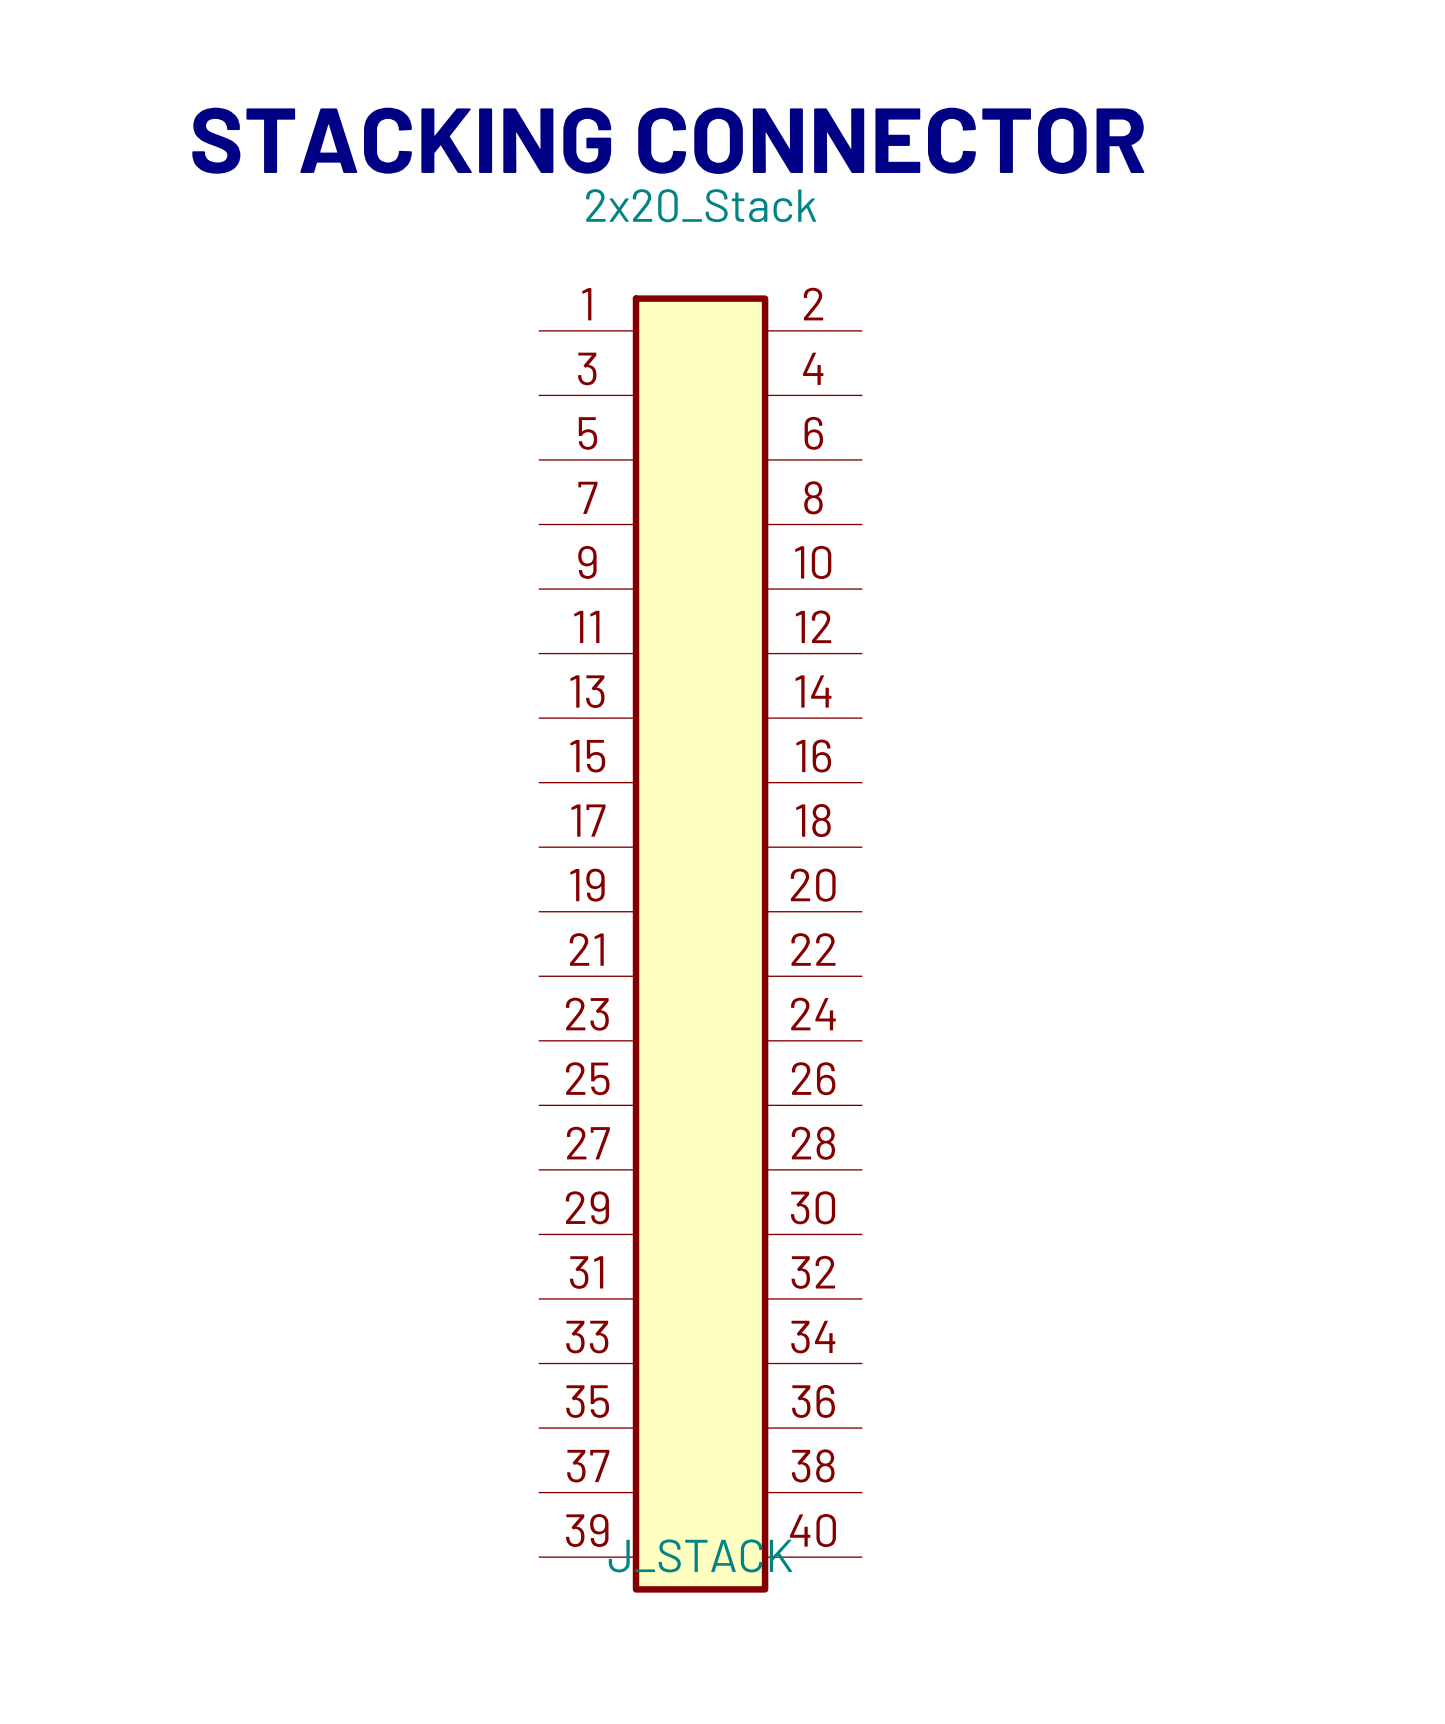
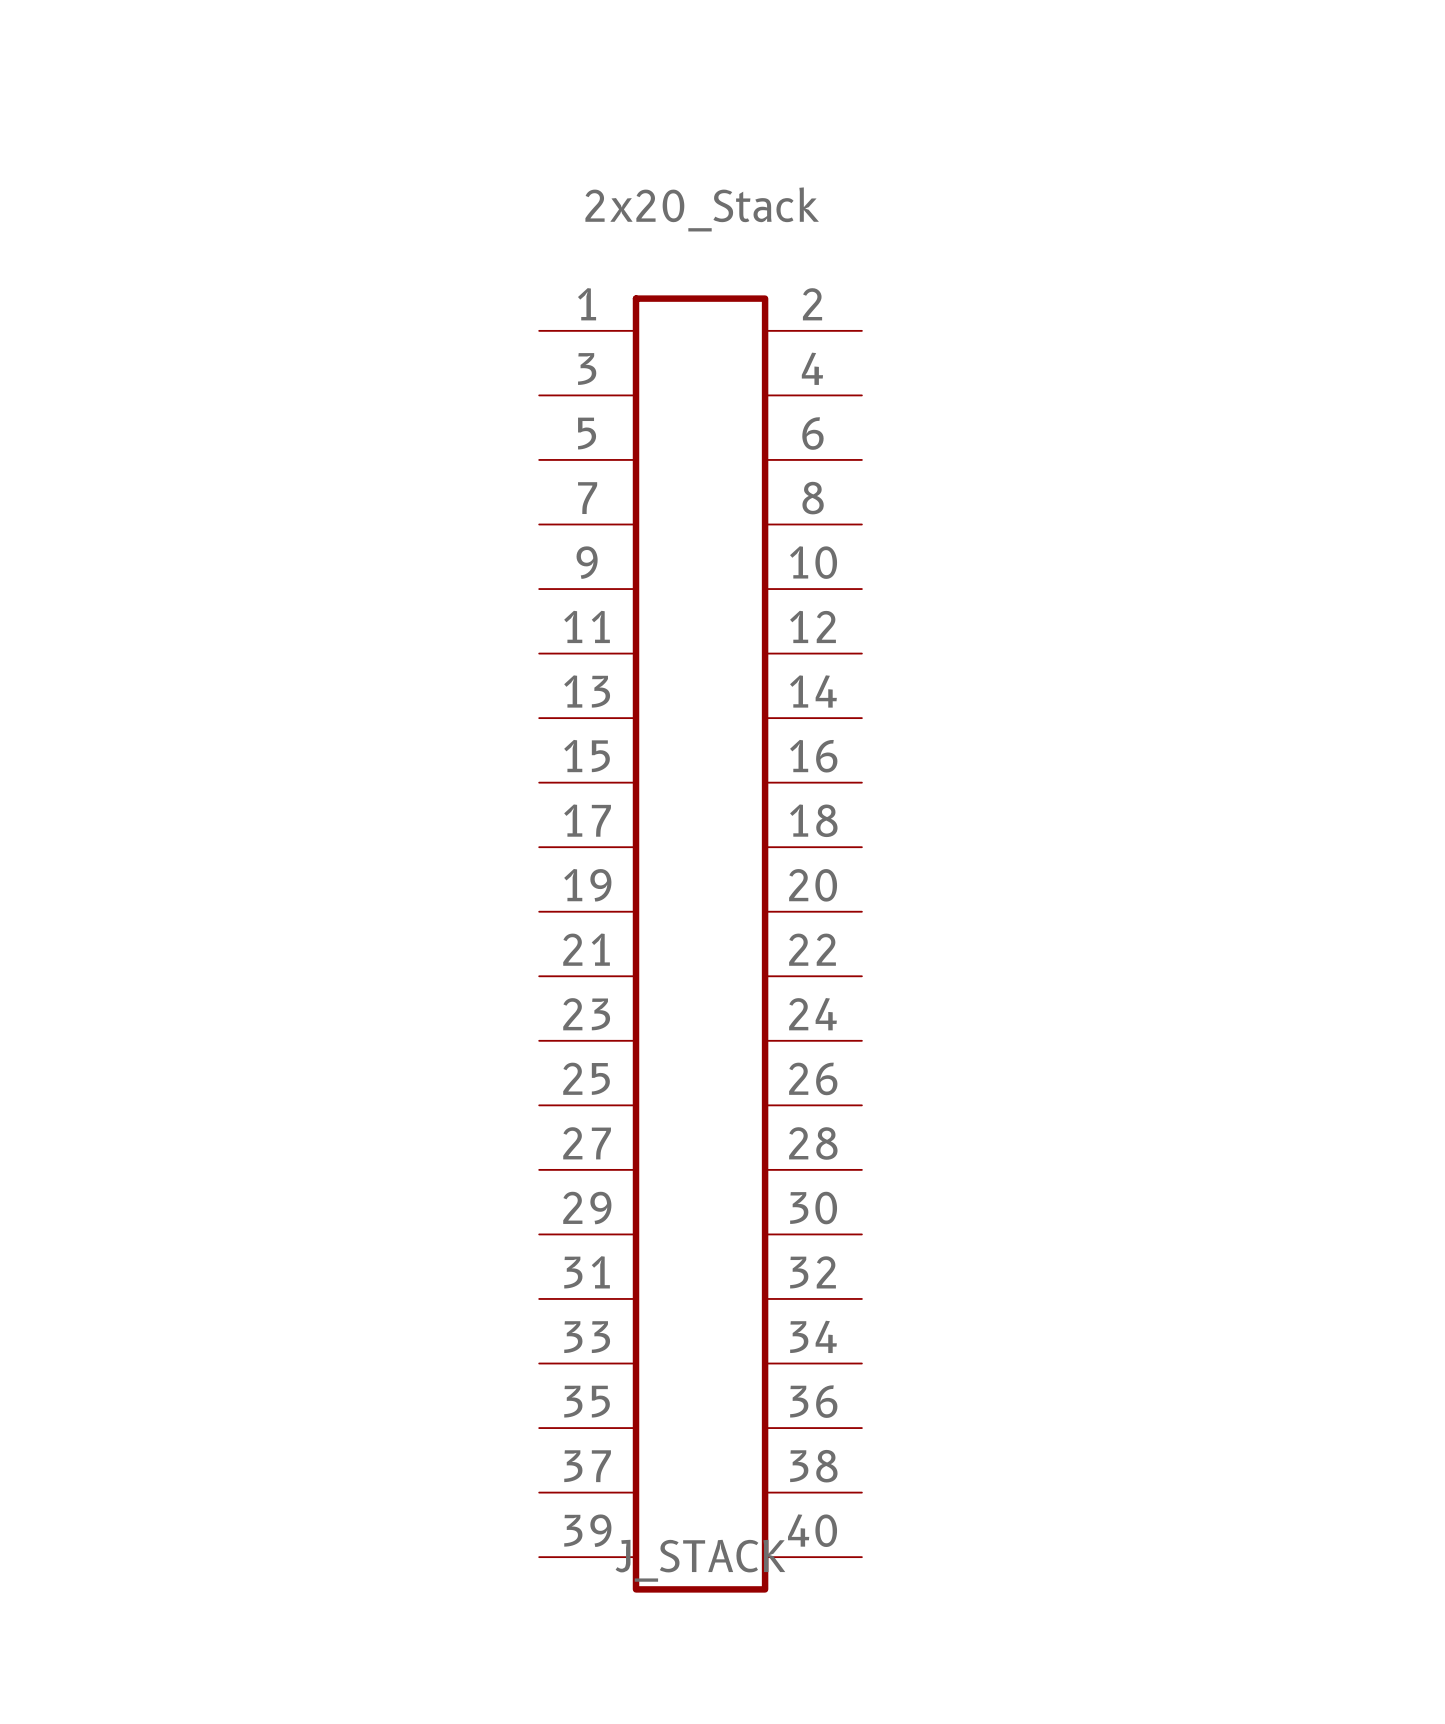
text: STACKING CONNECTOR (668, 140) -> none

